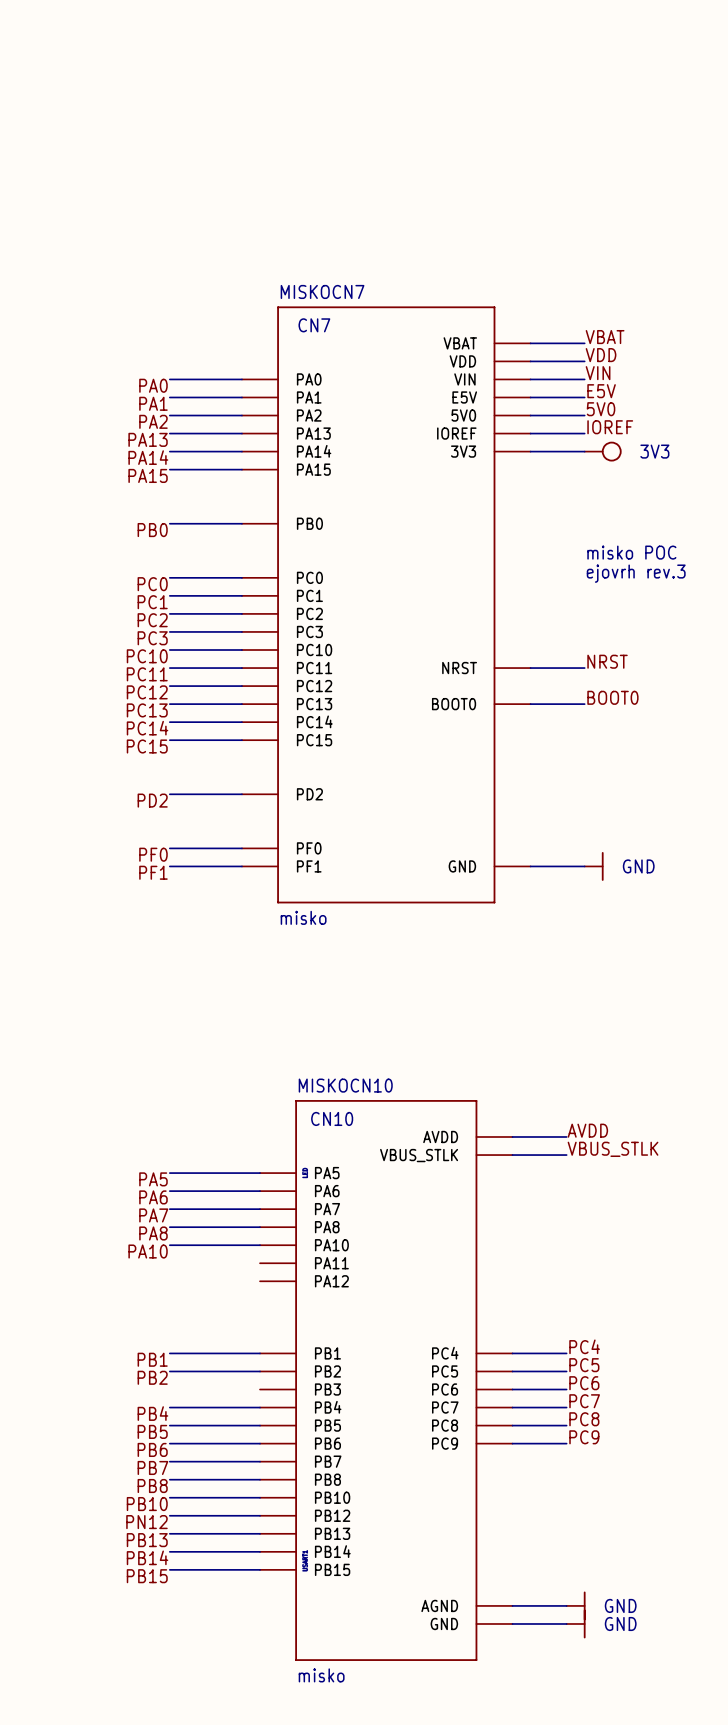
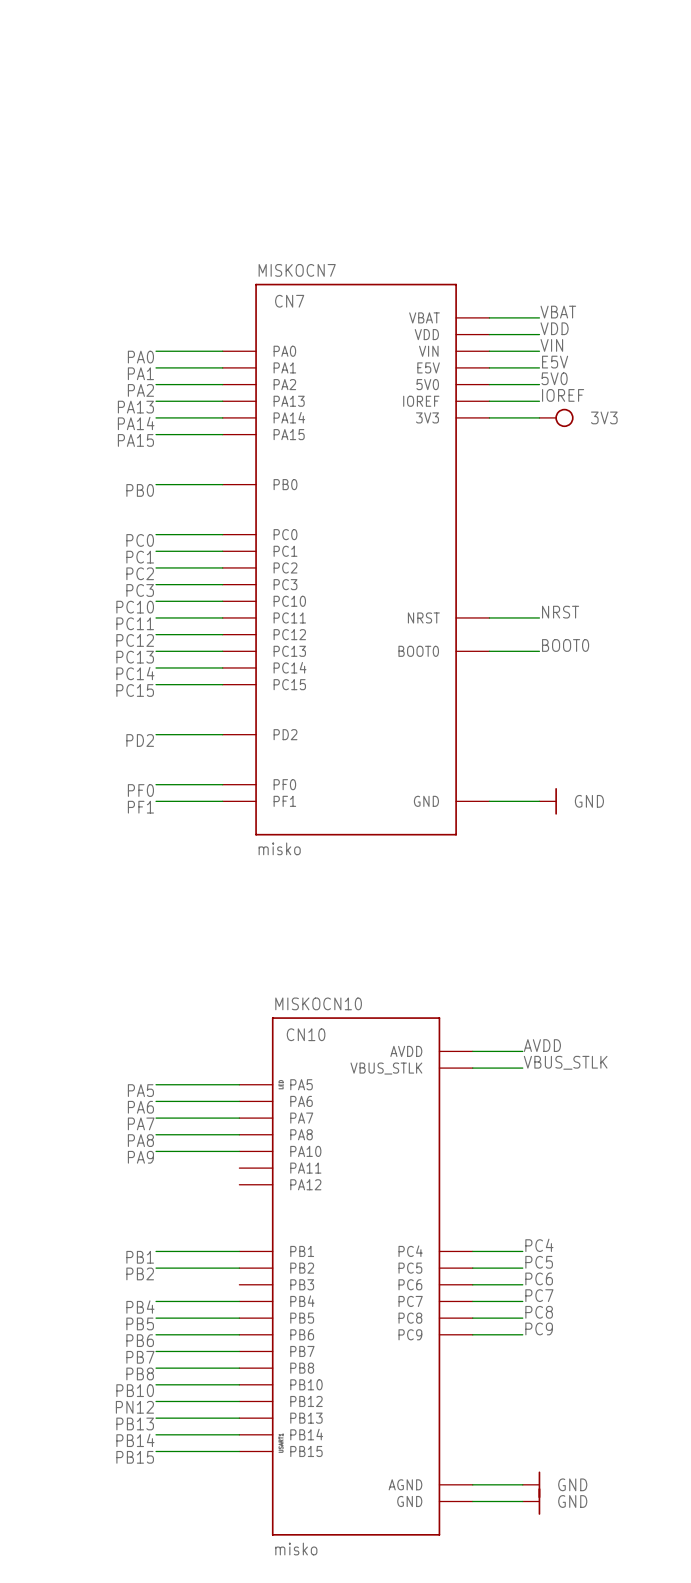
text: misko POC (631, 552) -> none
text: ejovrh rev.3 (636, 573) -> none
label: PA10 (148, 1251) -> PA9 (140, 1157)

